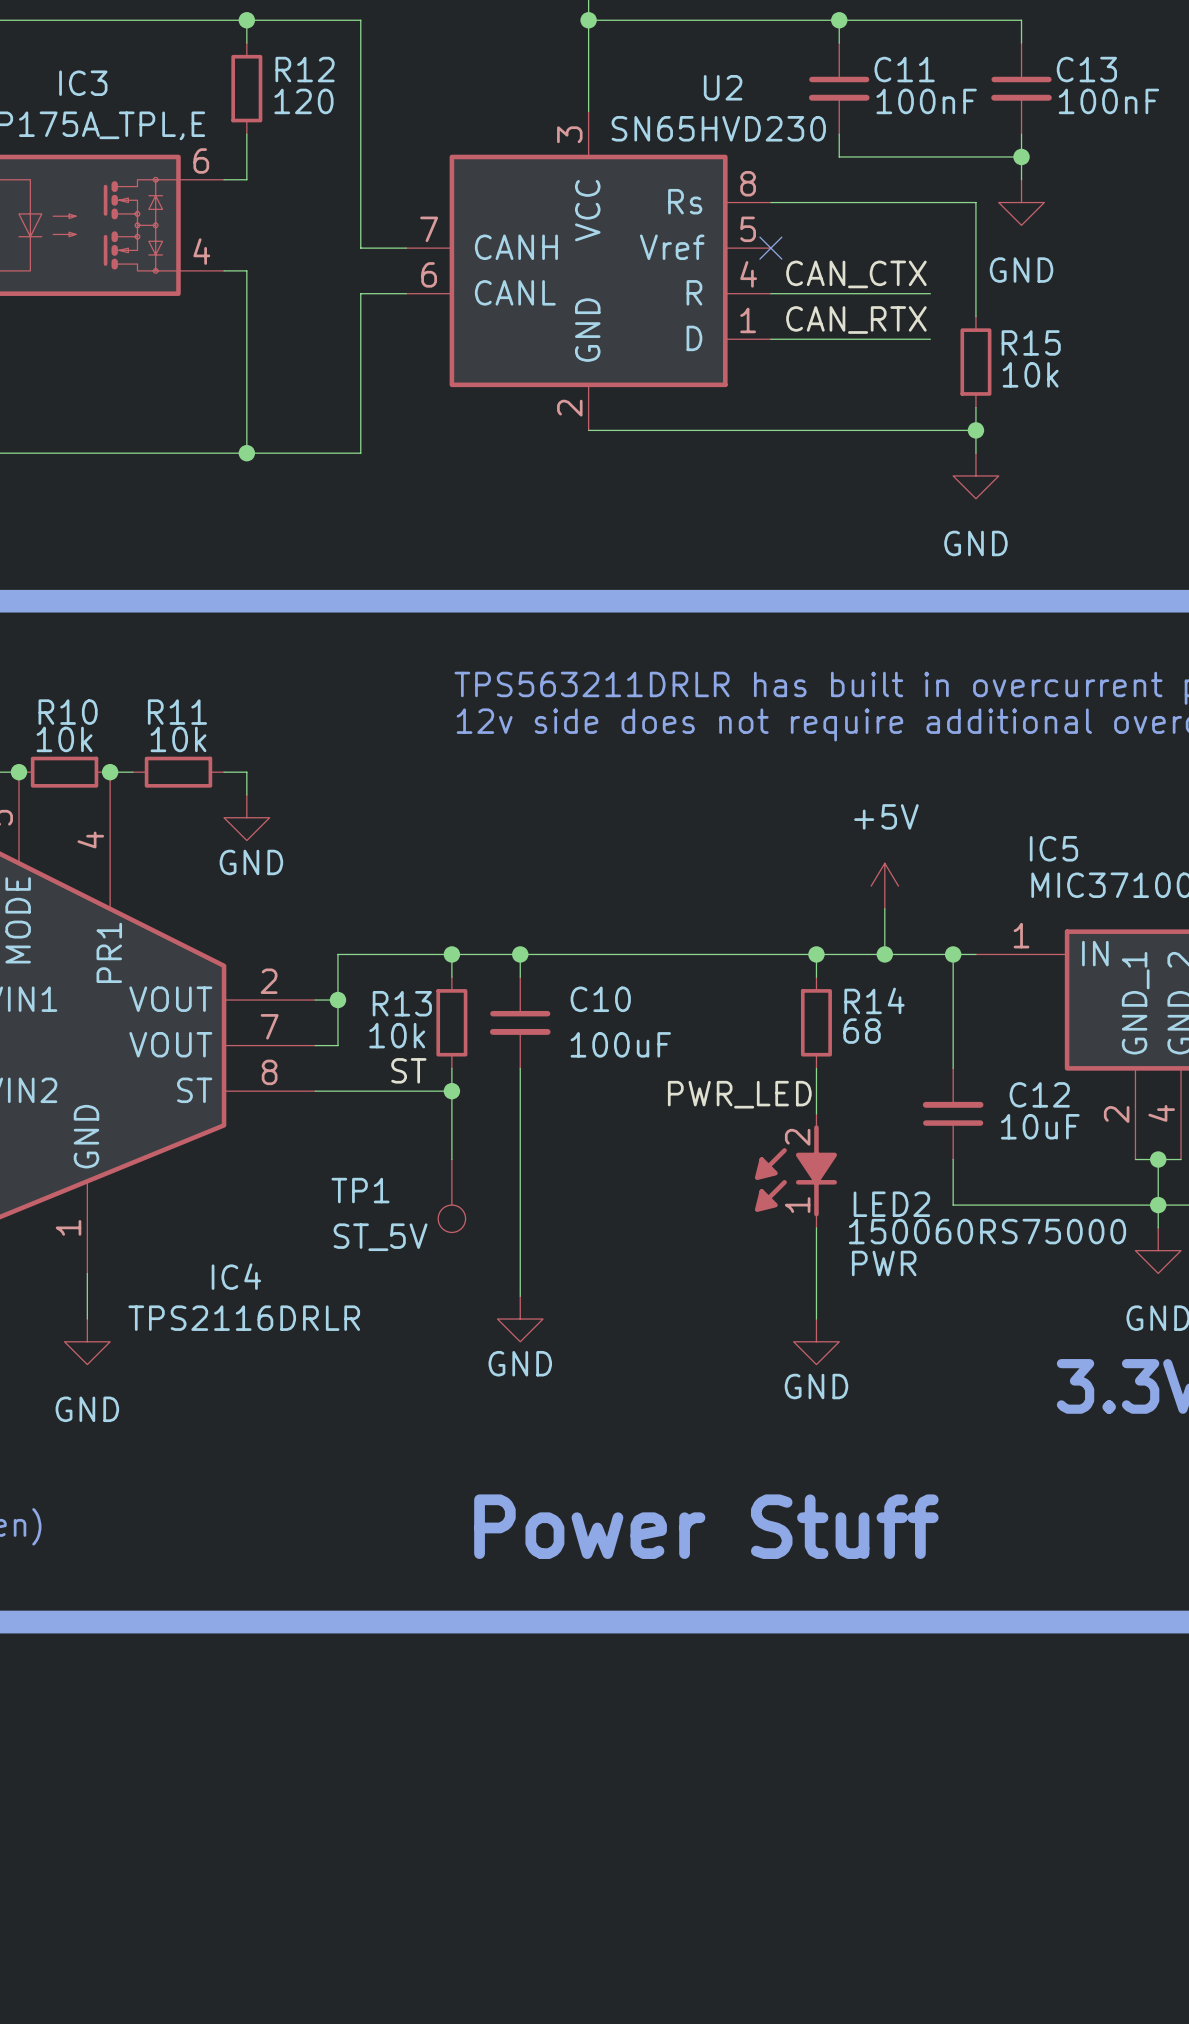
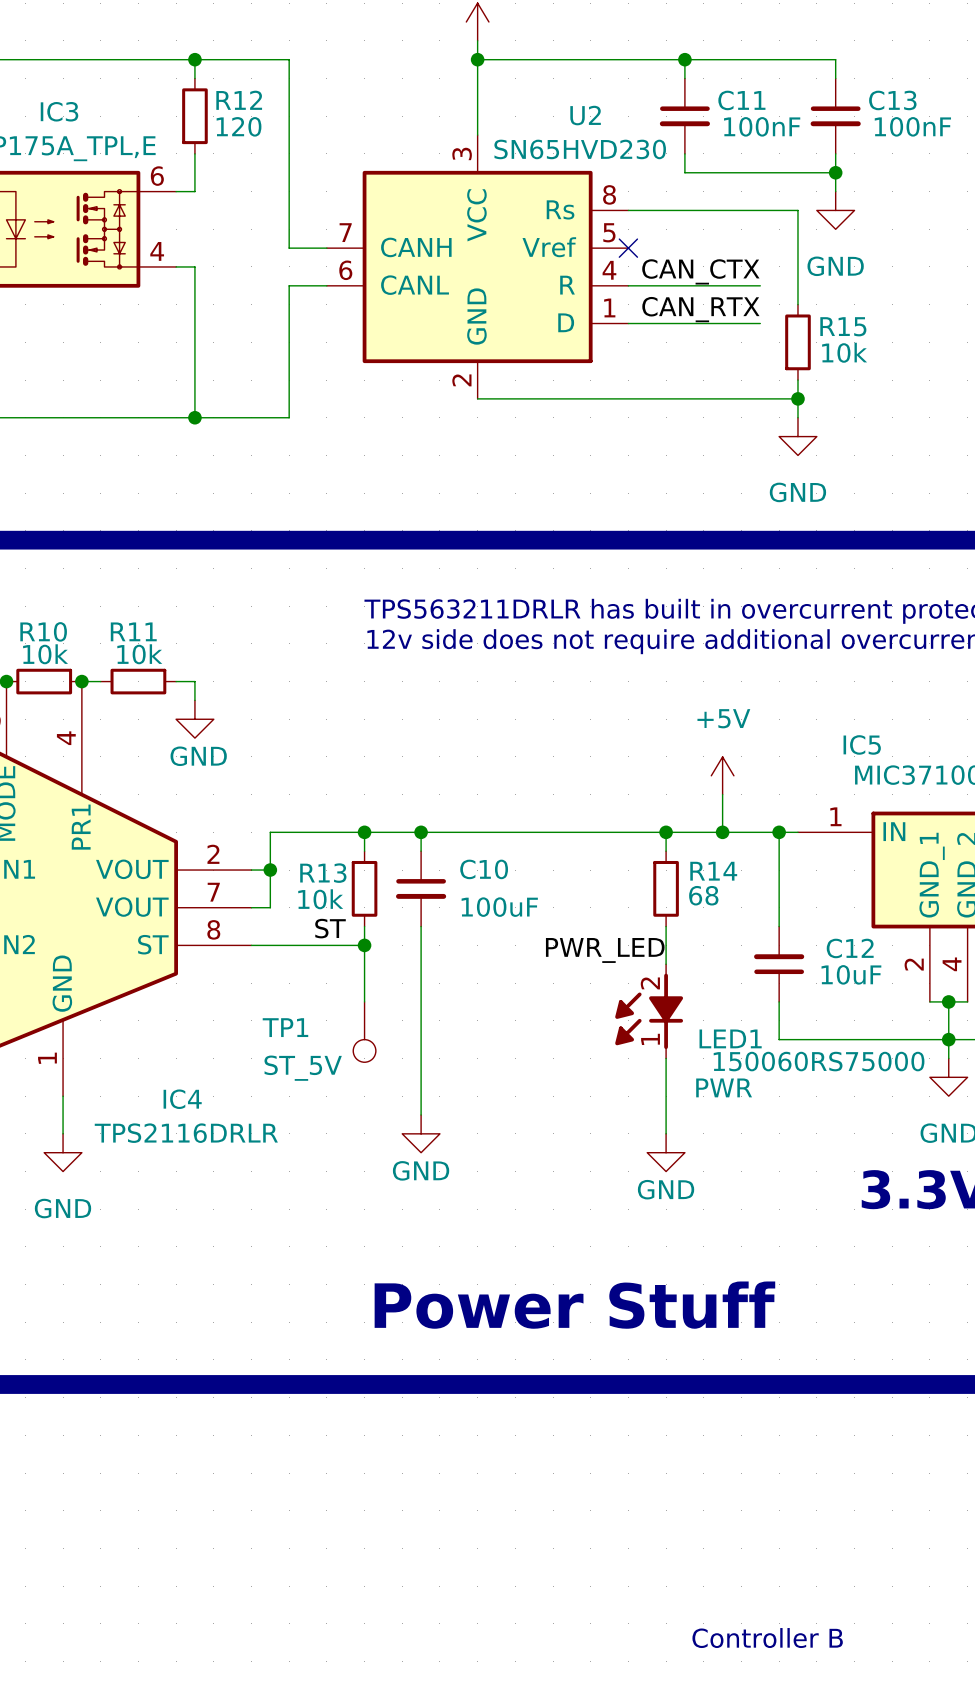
LED2 name: LED2 (891, 1204) -> LED1 (730, 1038)
text: none -> Controller B (767, 1638)

